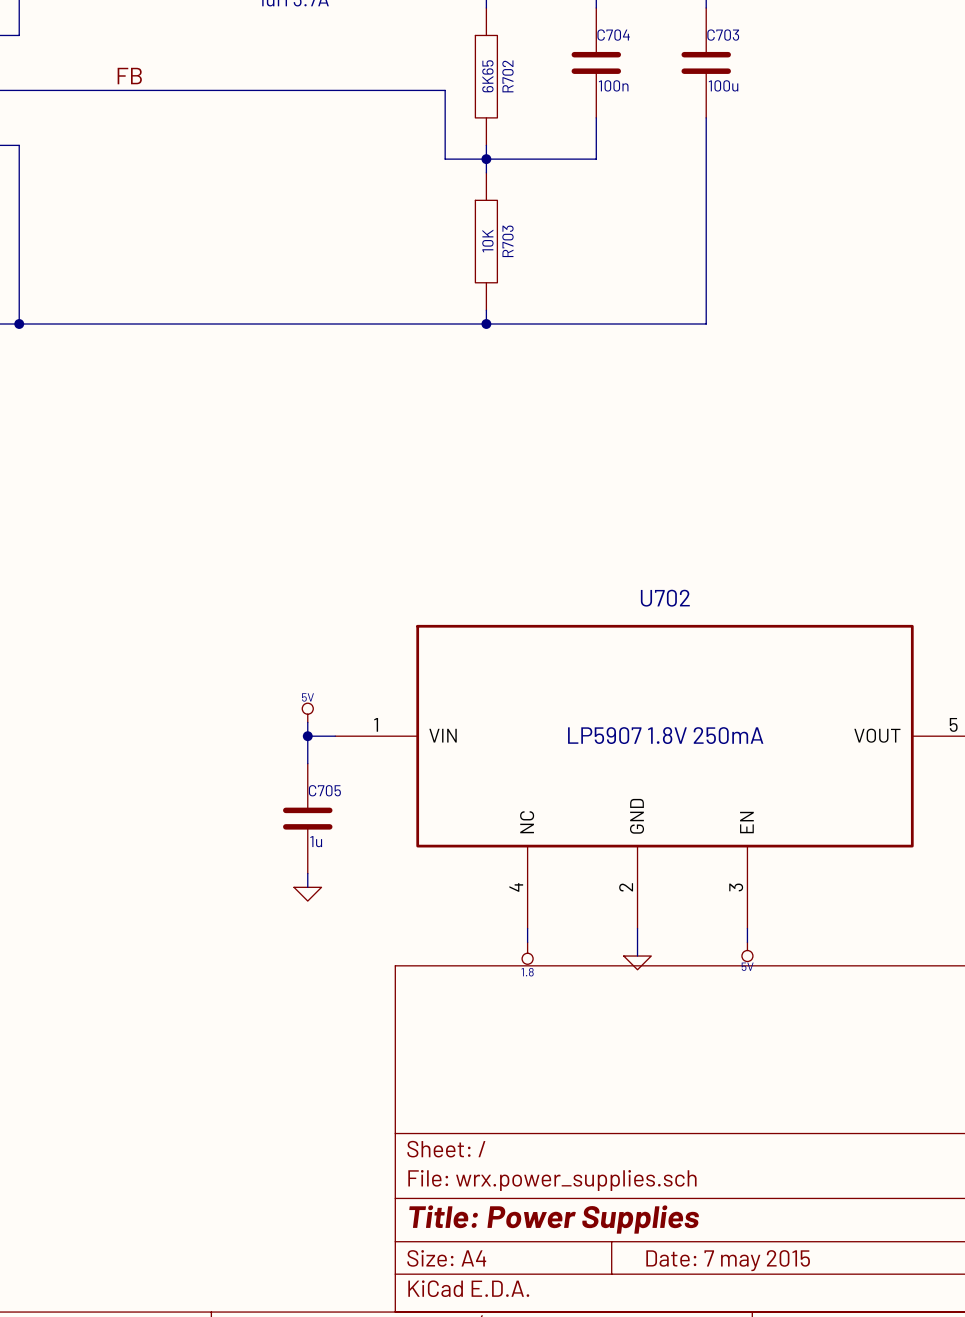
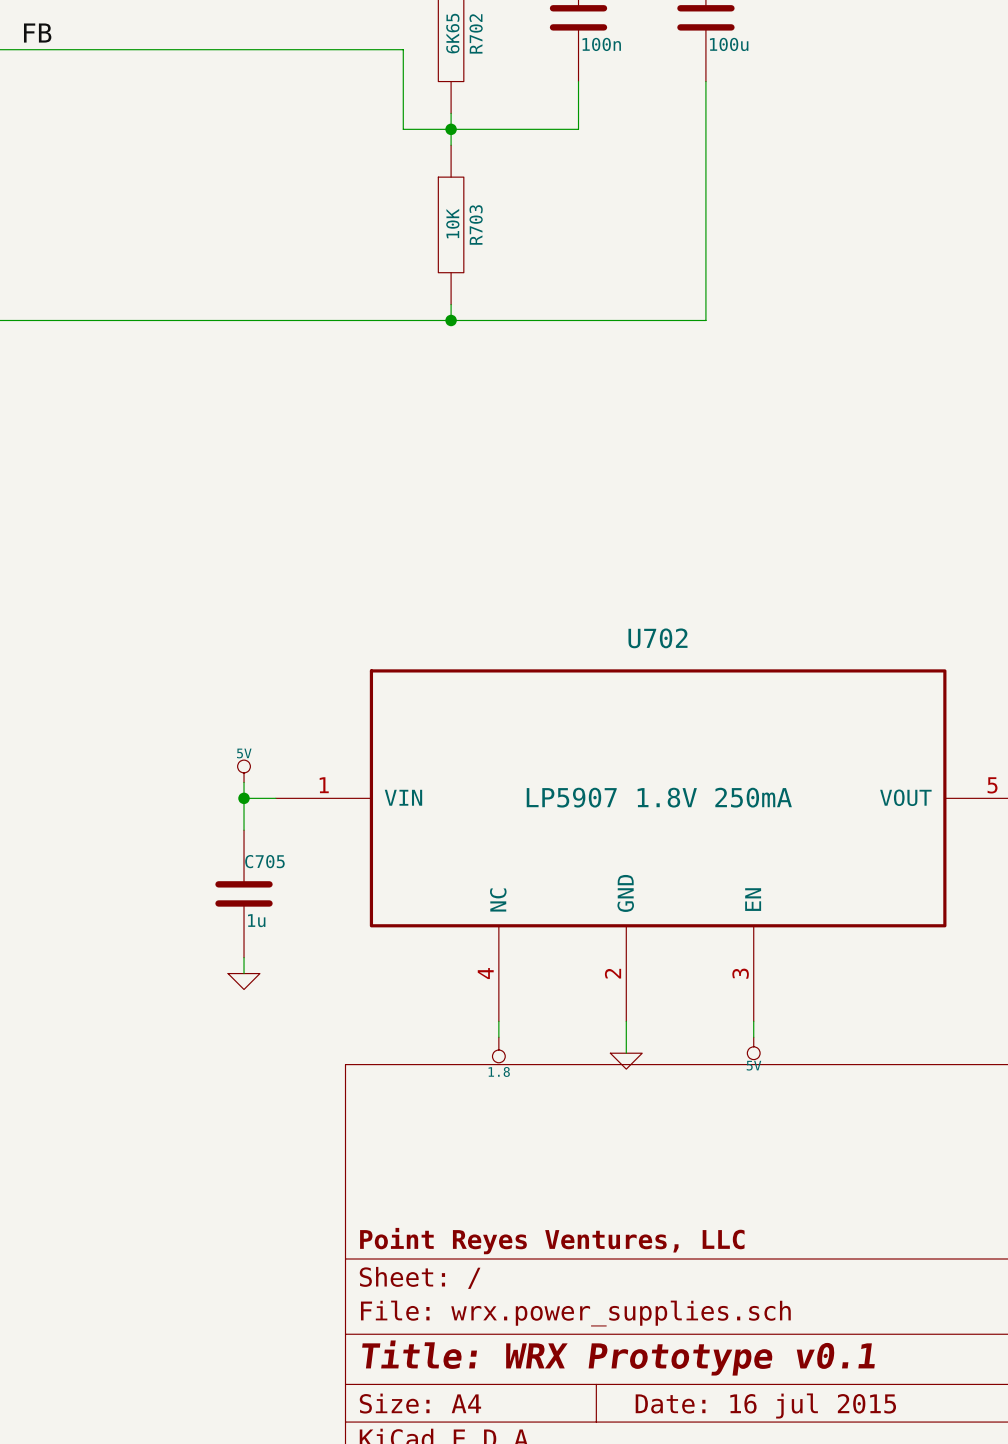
title block: none -> Point Reyes Ventures, LLC (552, 1241)
title block: Title: Power Supplies (554, 1219) -> Title: WRX Prototype v0.1 (618, 1358)
title block: Date: 7 may 2015 (728, 1260) -> Date: 16 jul 2015 (765, 1406)

